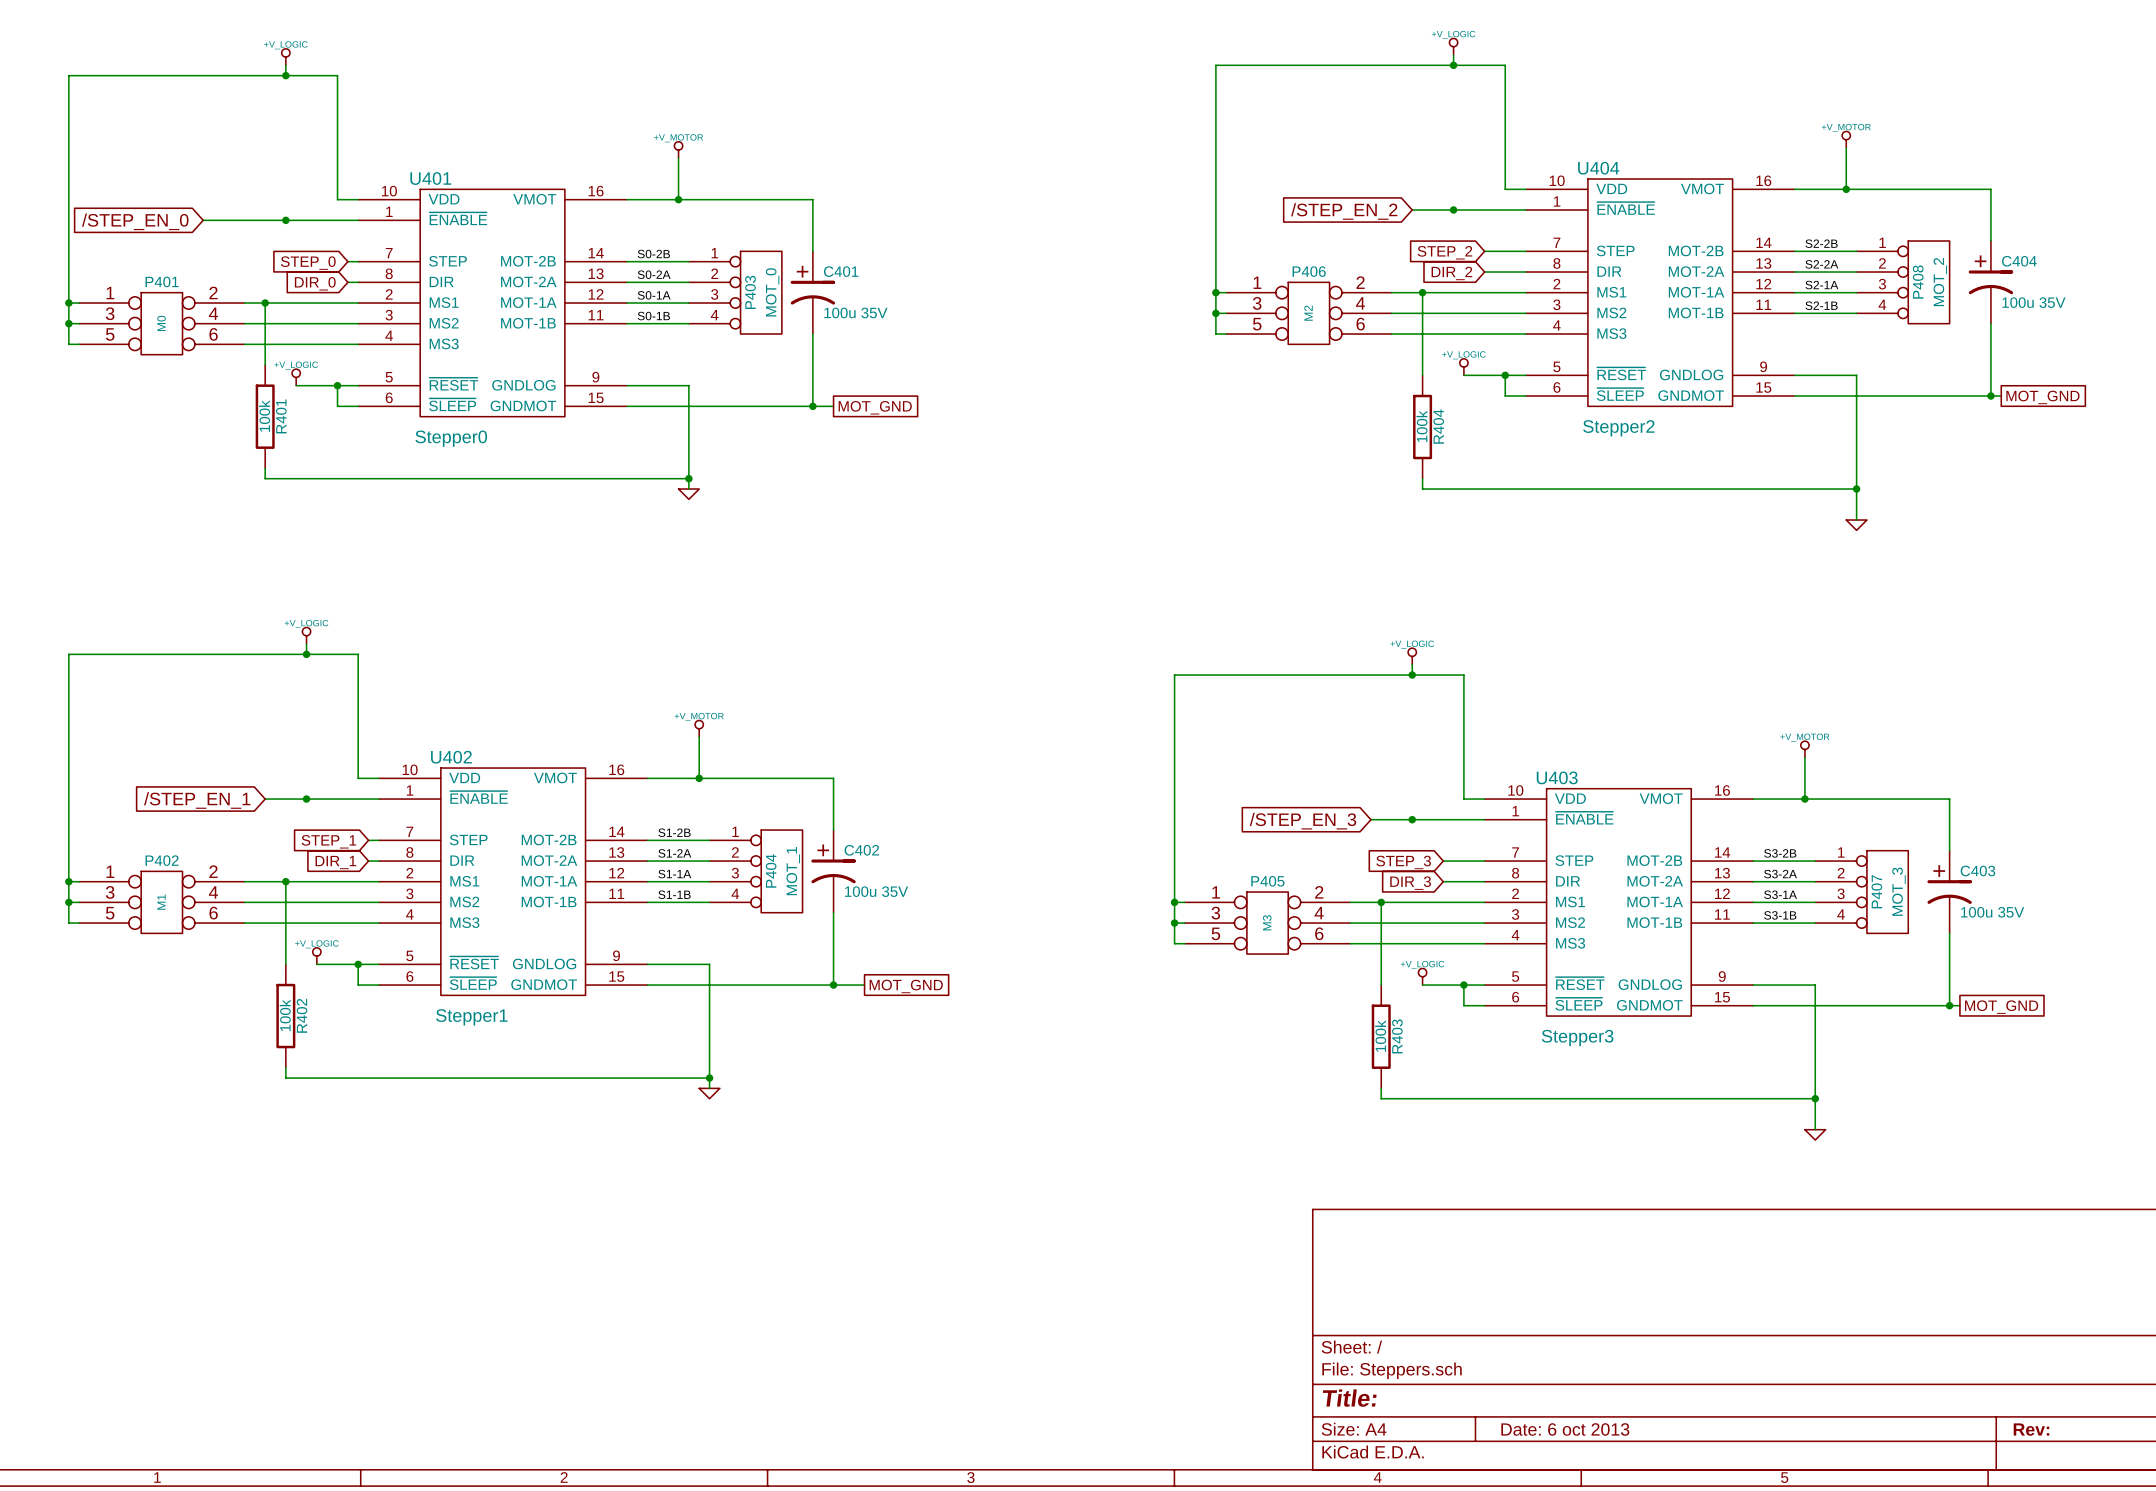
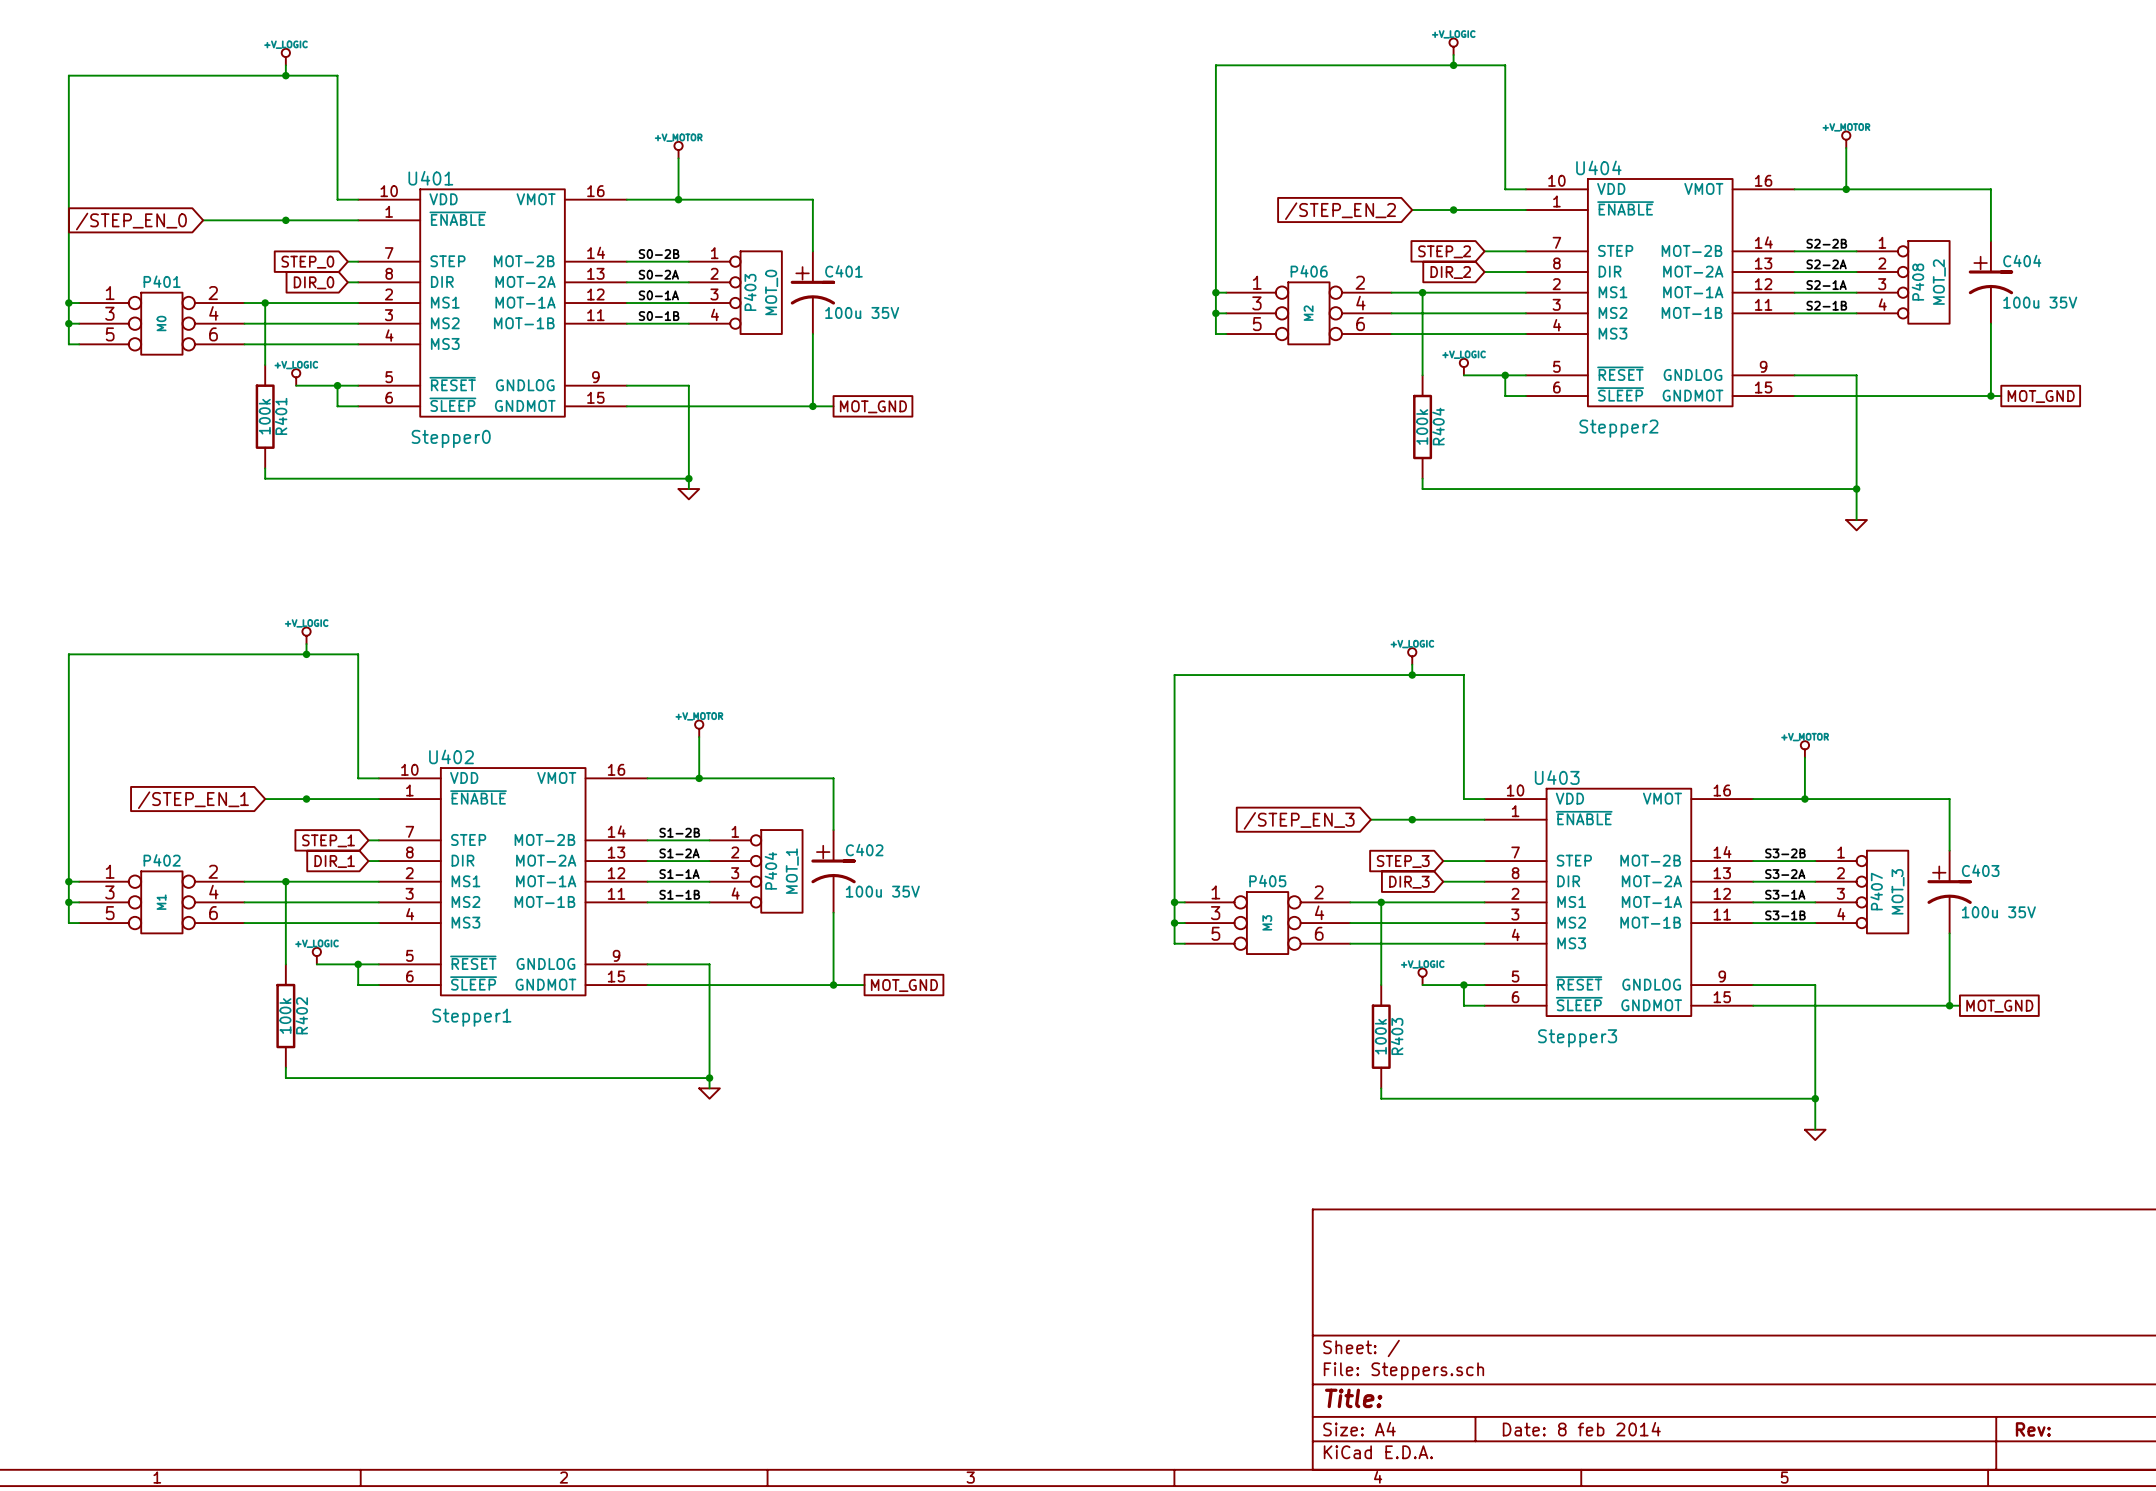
title block: Date: 6 oct 2013 (1565, 1429) -> Date: 8 feb 2014 (1581, 1429)

